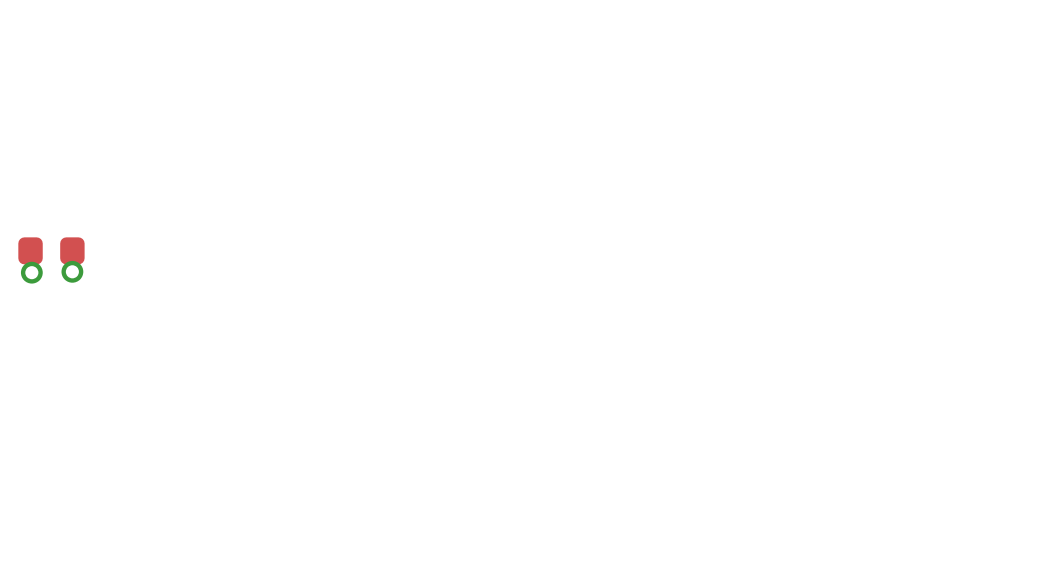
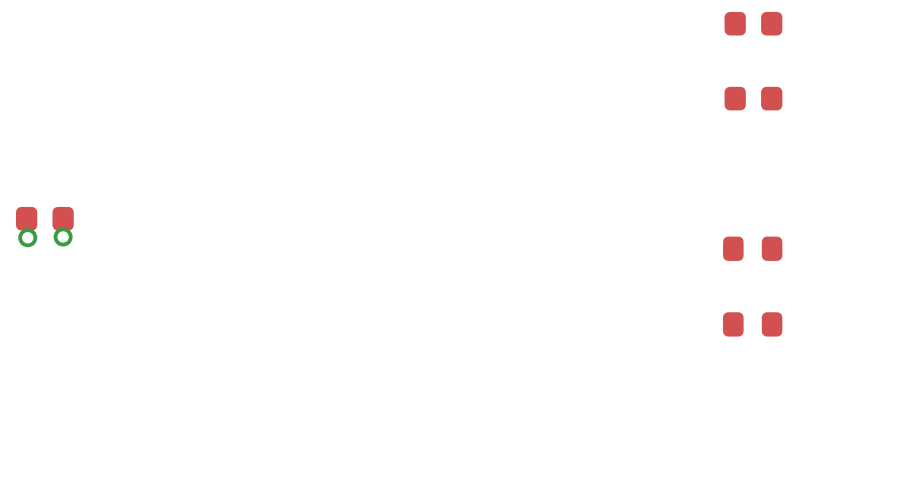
part: none -> (753, 23)
part: none -> (753, 98)
part: none -> (752, 248)
part: none -> (752, 324)

